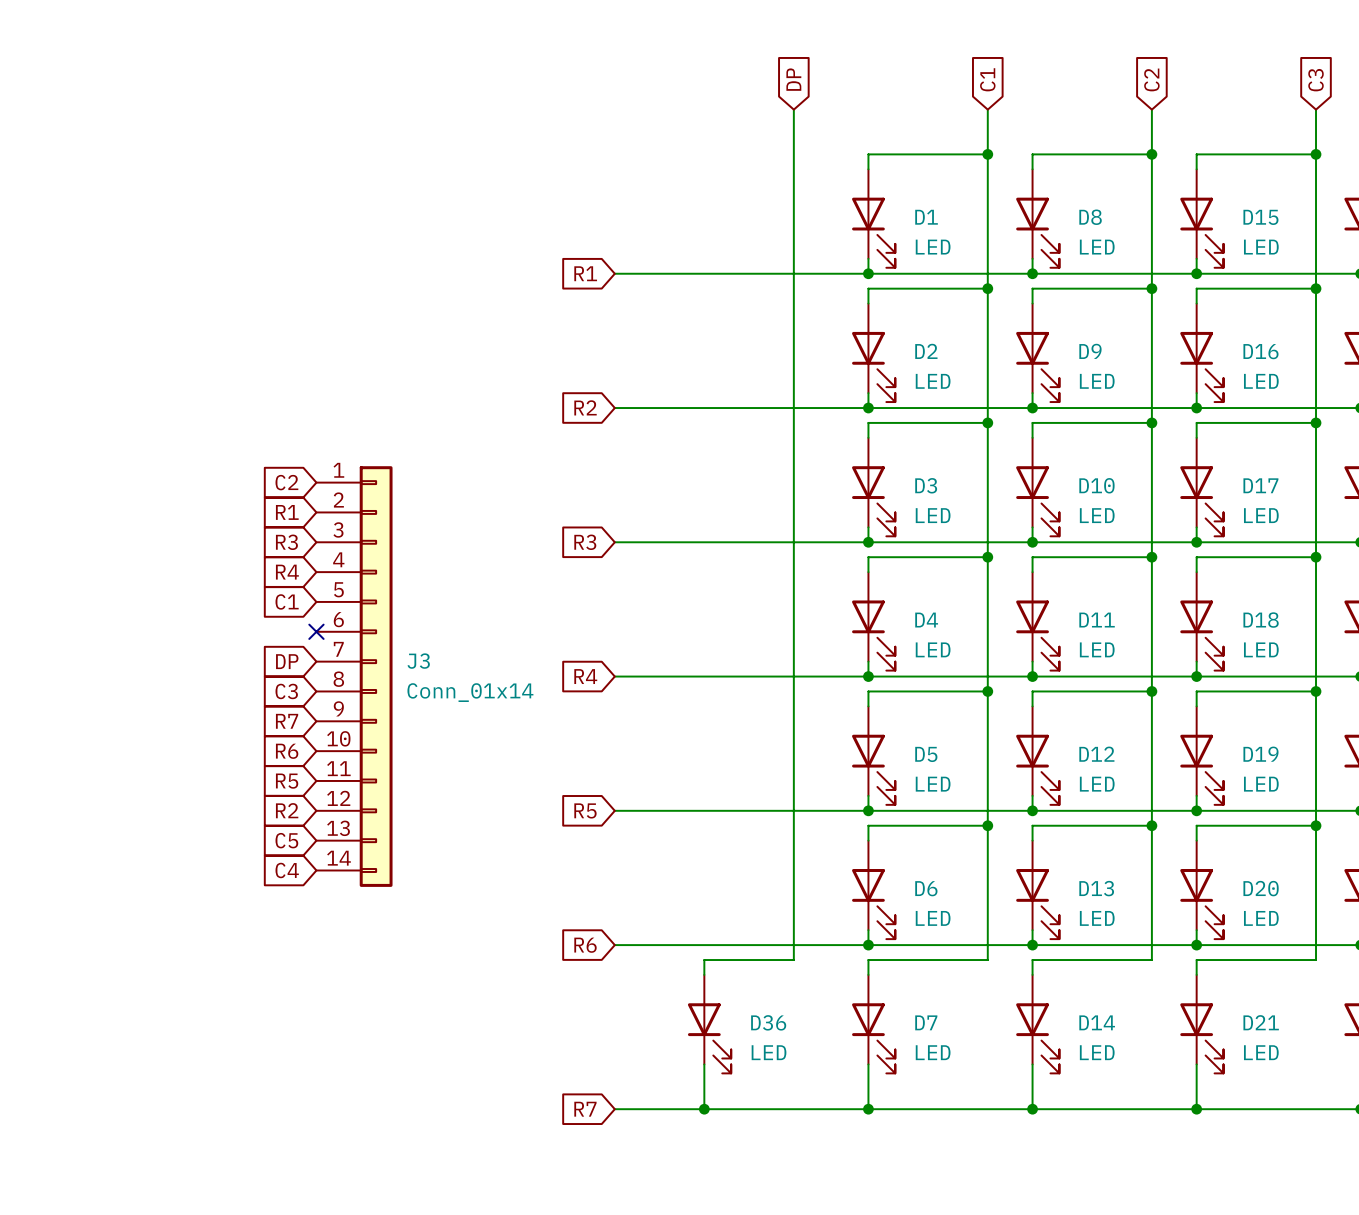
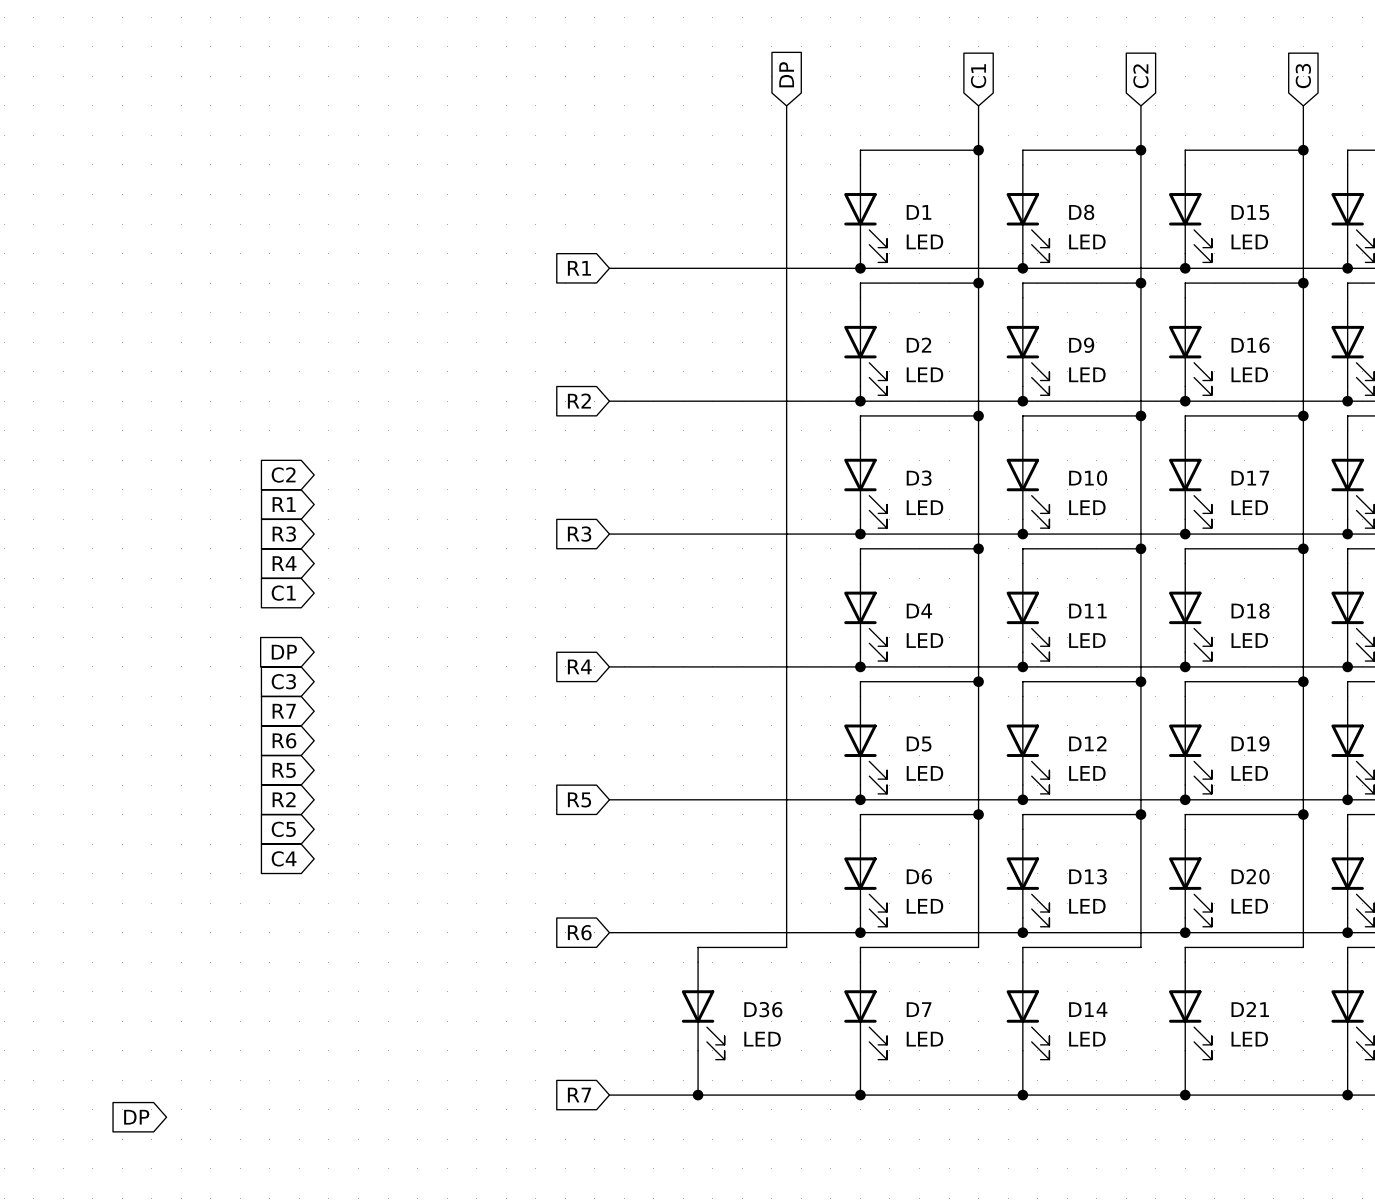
no-connect mark: (316, 631) -> none
J3: Conn_01x14 (354, 676) -> none
global label: none -> DP (136, 1117)

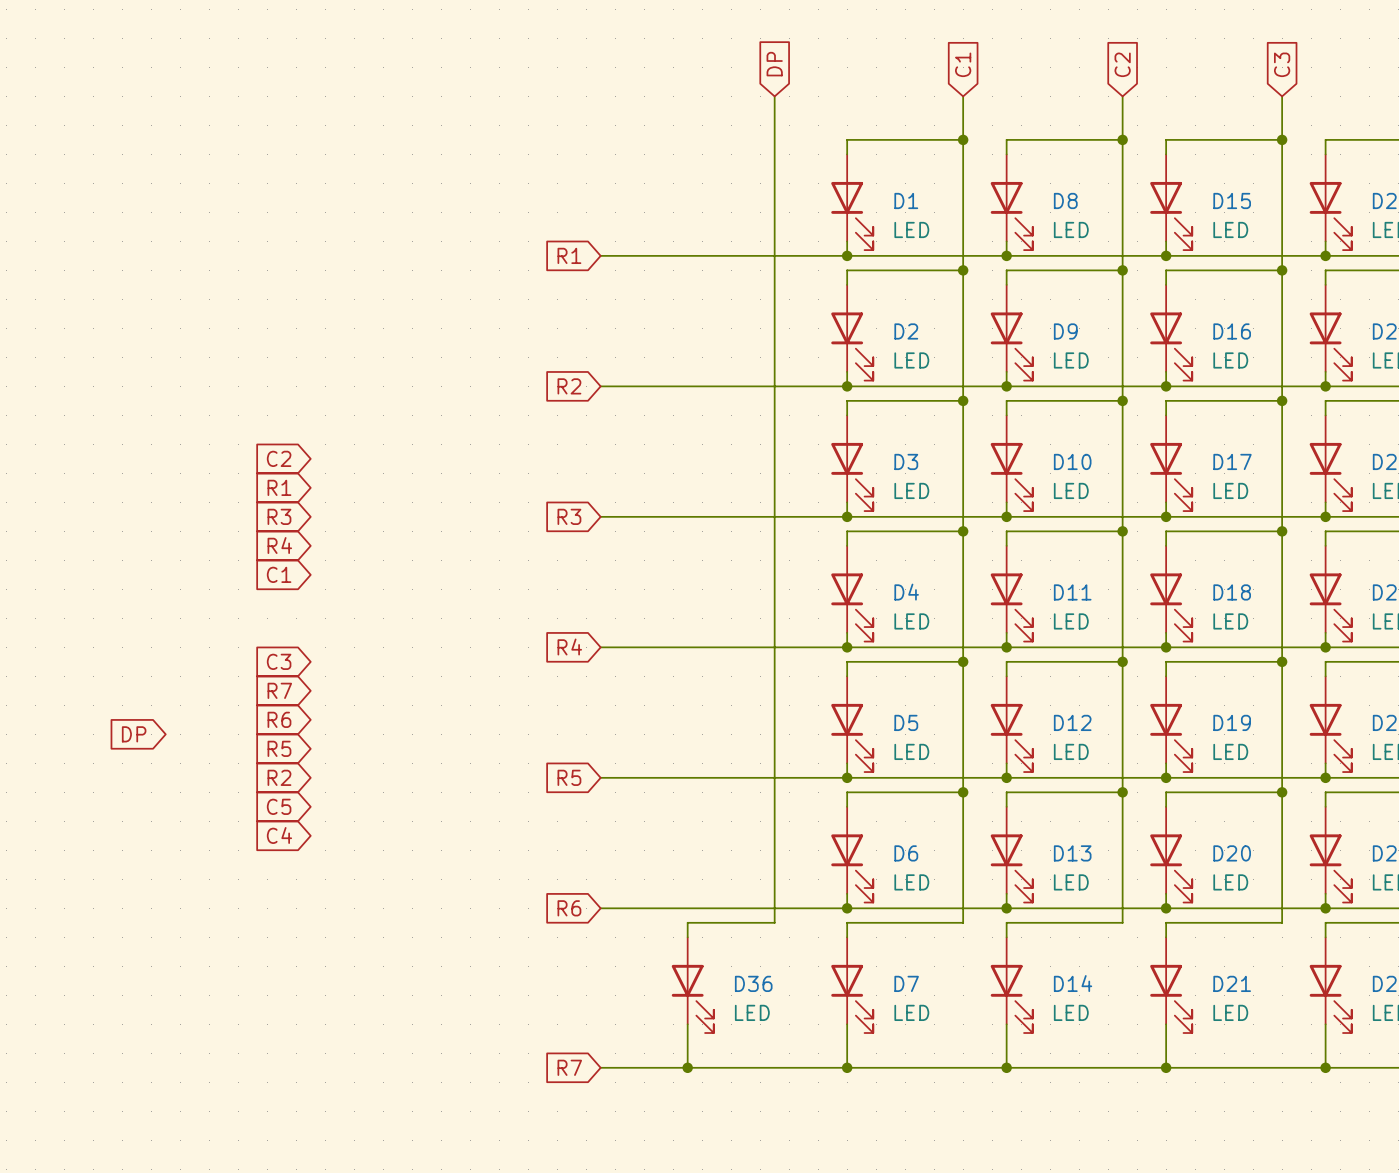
global label position: DP (284, 652) -> DP (134, 734)
global label: DP (136, 1117) -> none

